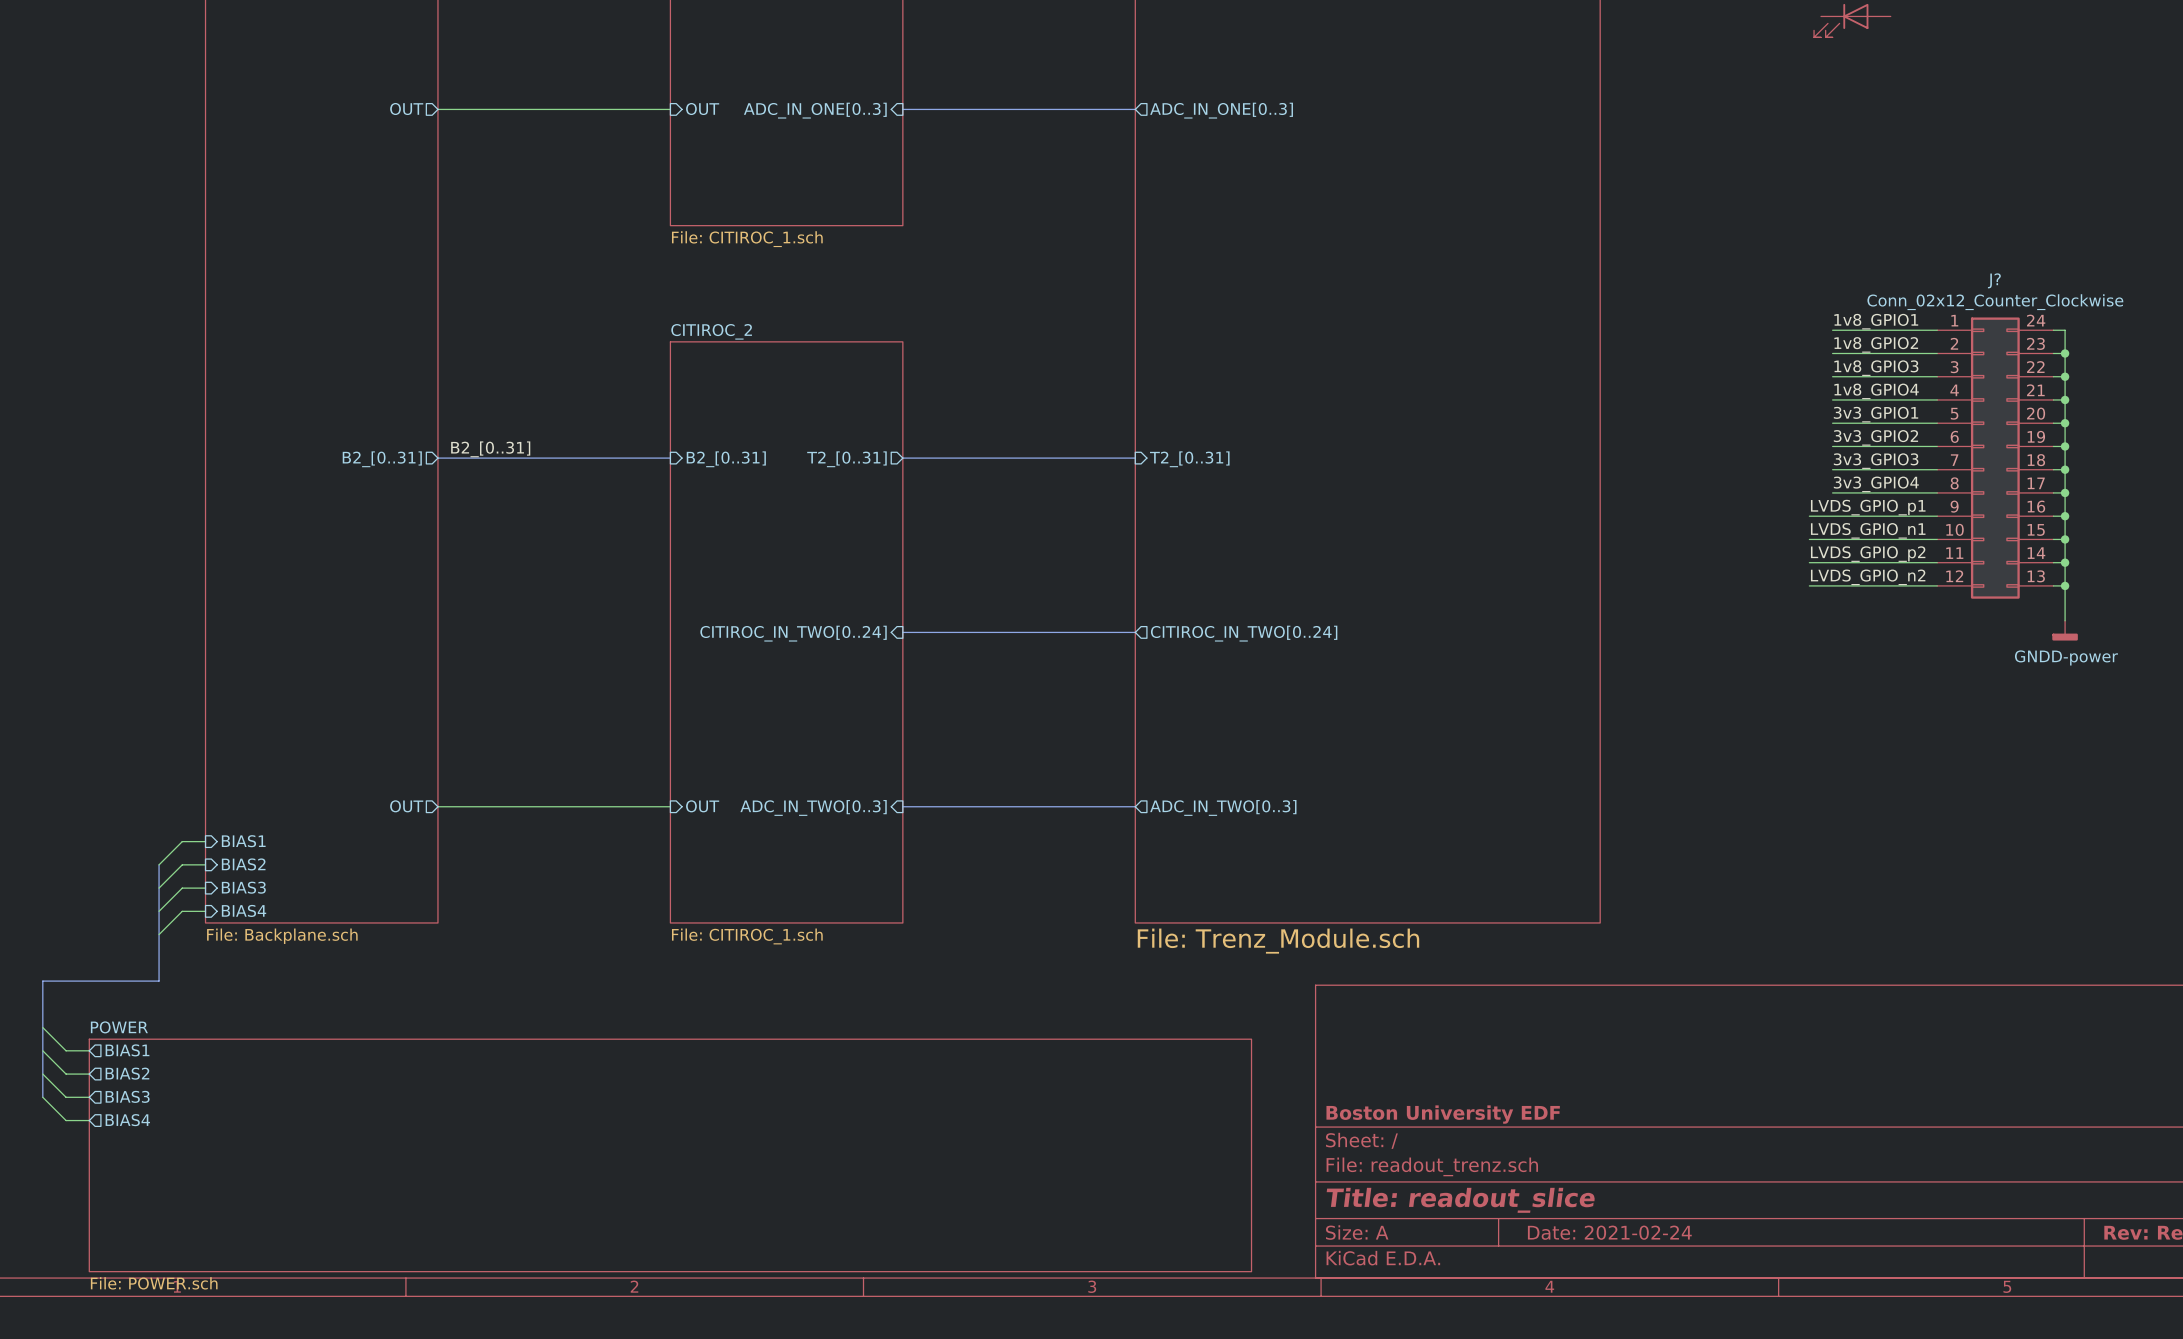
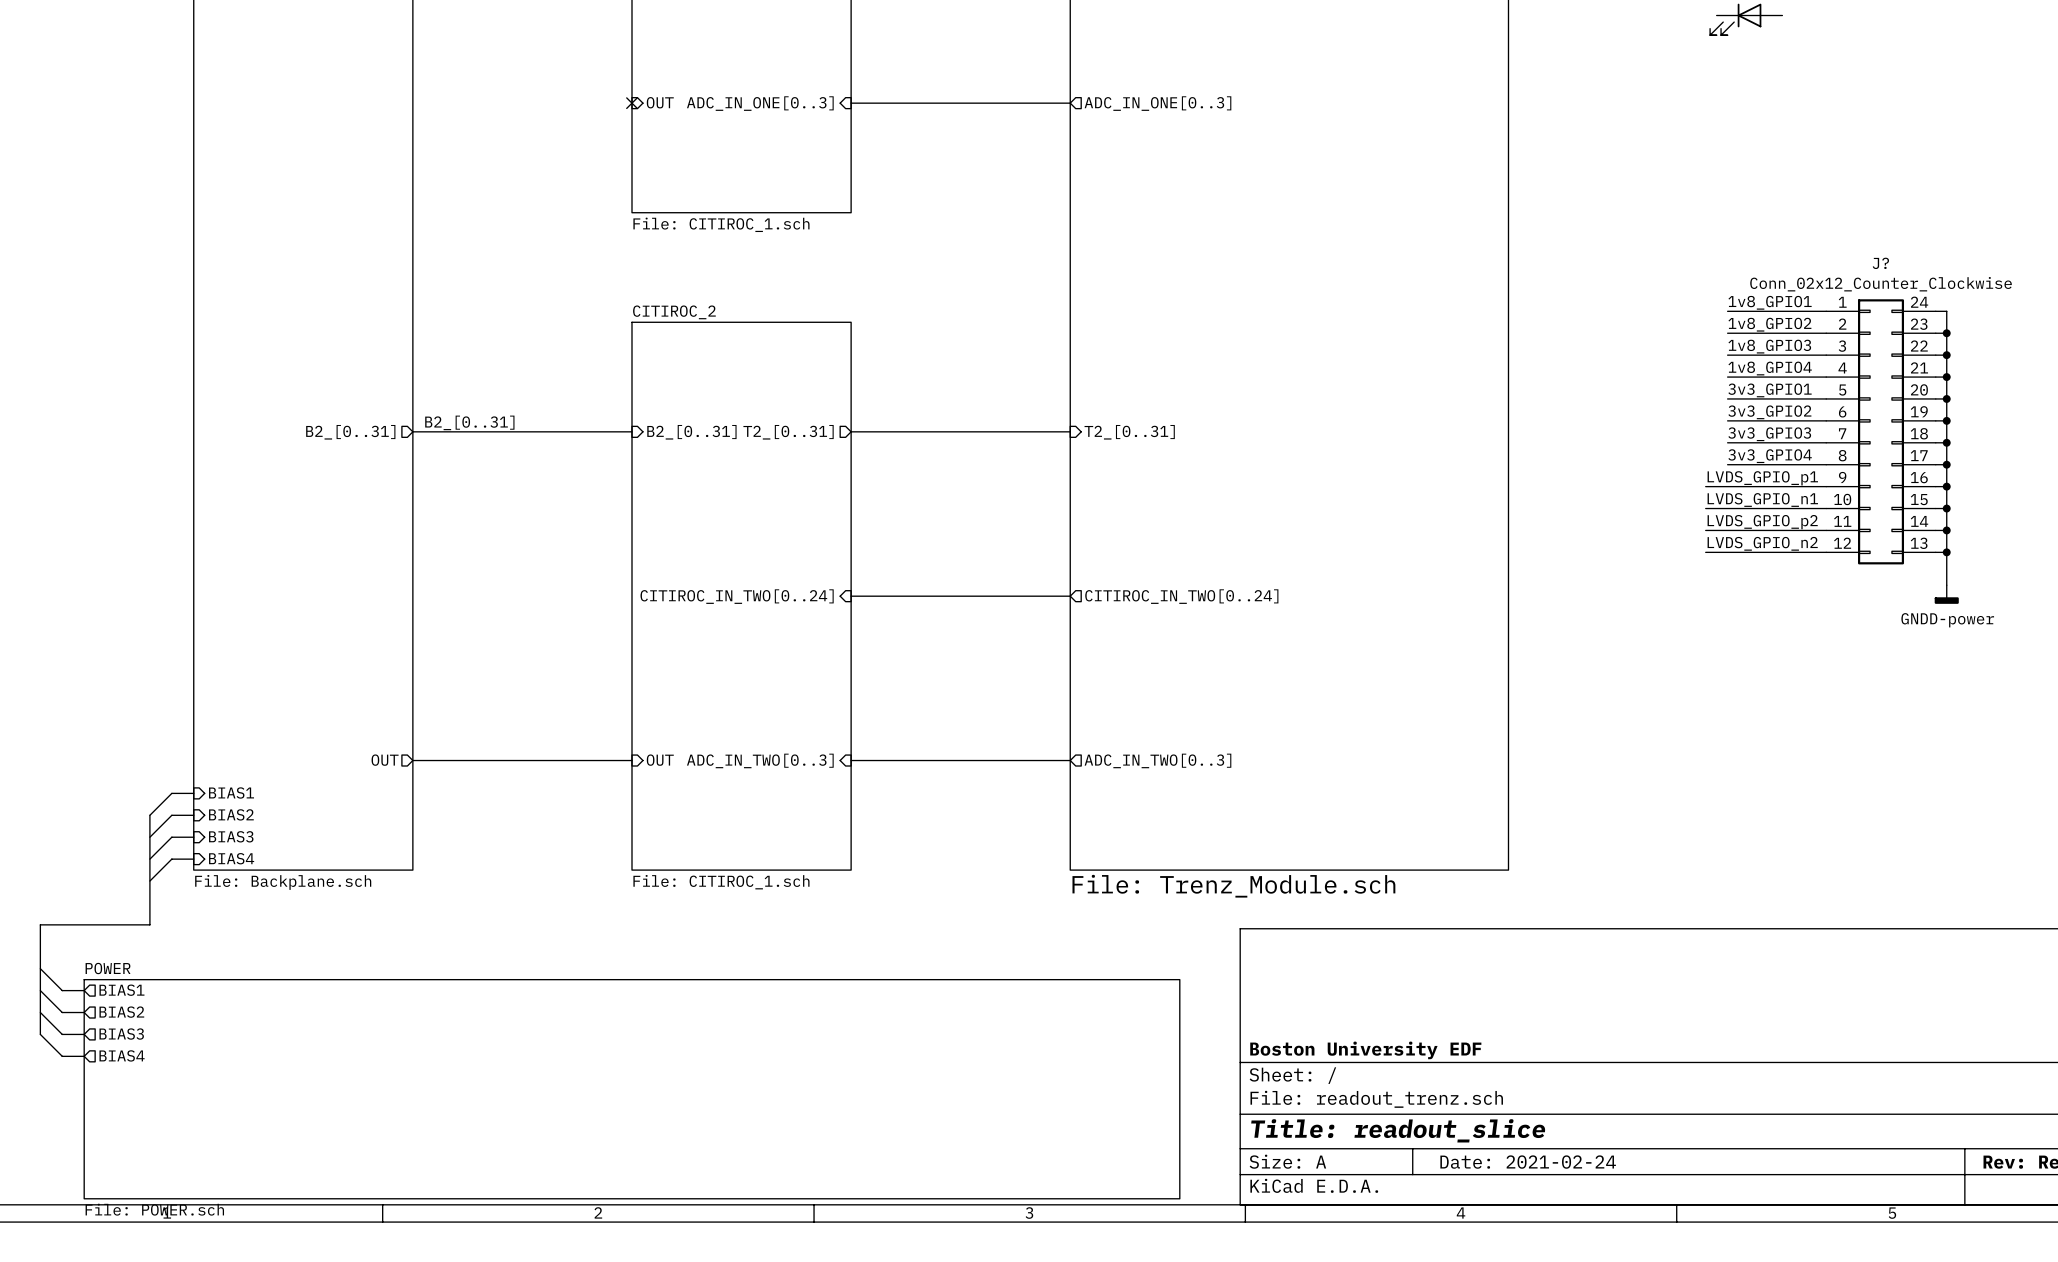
sheet pin: OUT (406, 109) -> none
wire: (437, 109) (670, 109) -> none
no-connect mark: none -> (631, 103)

